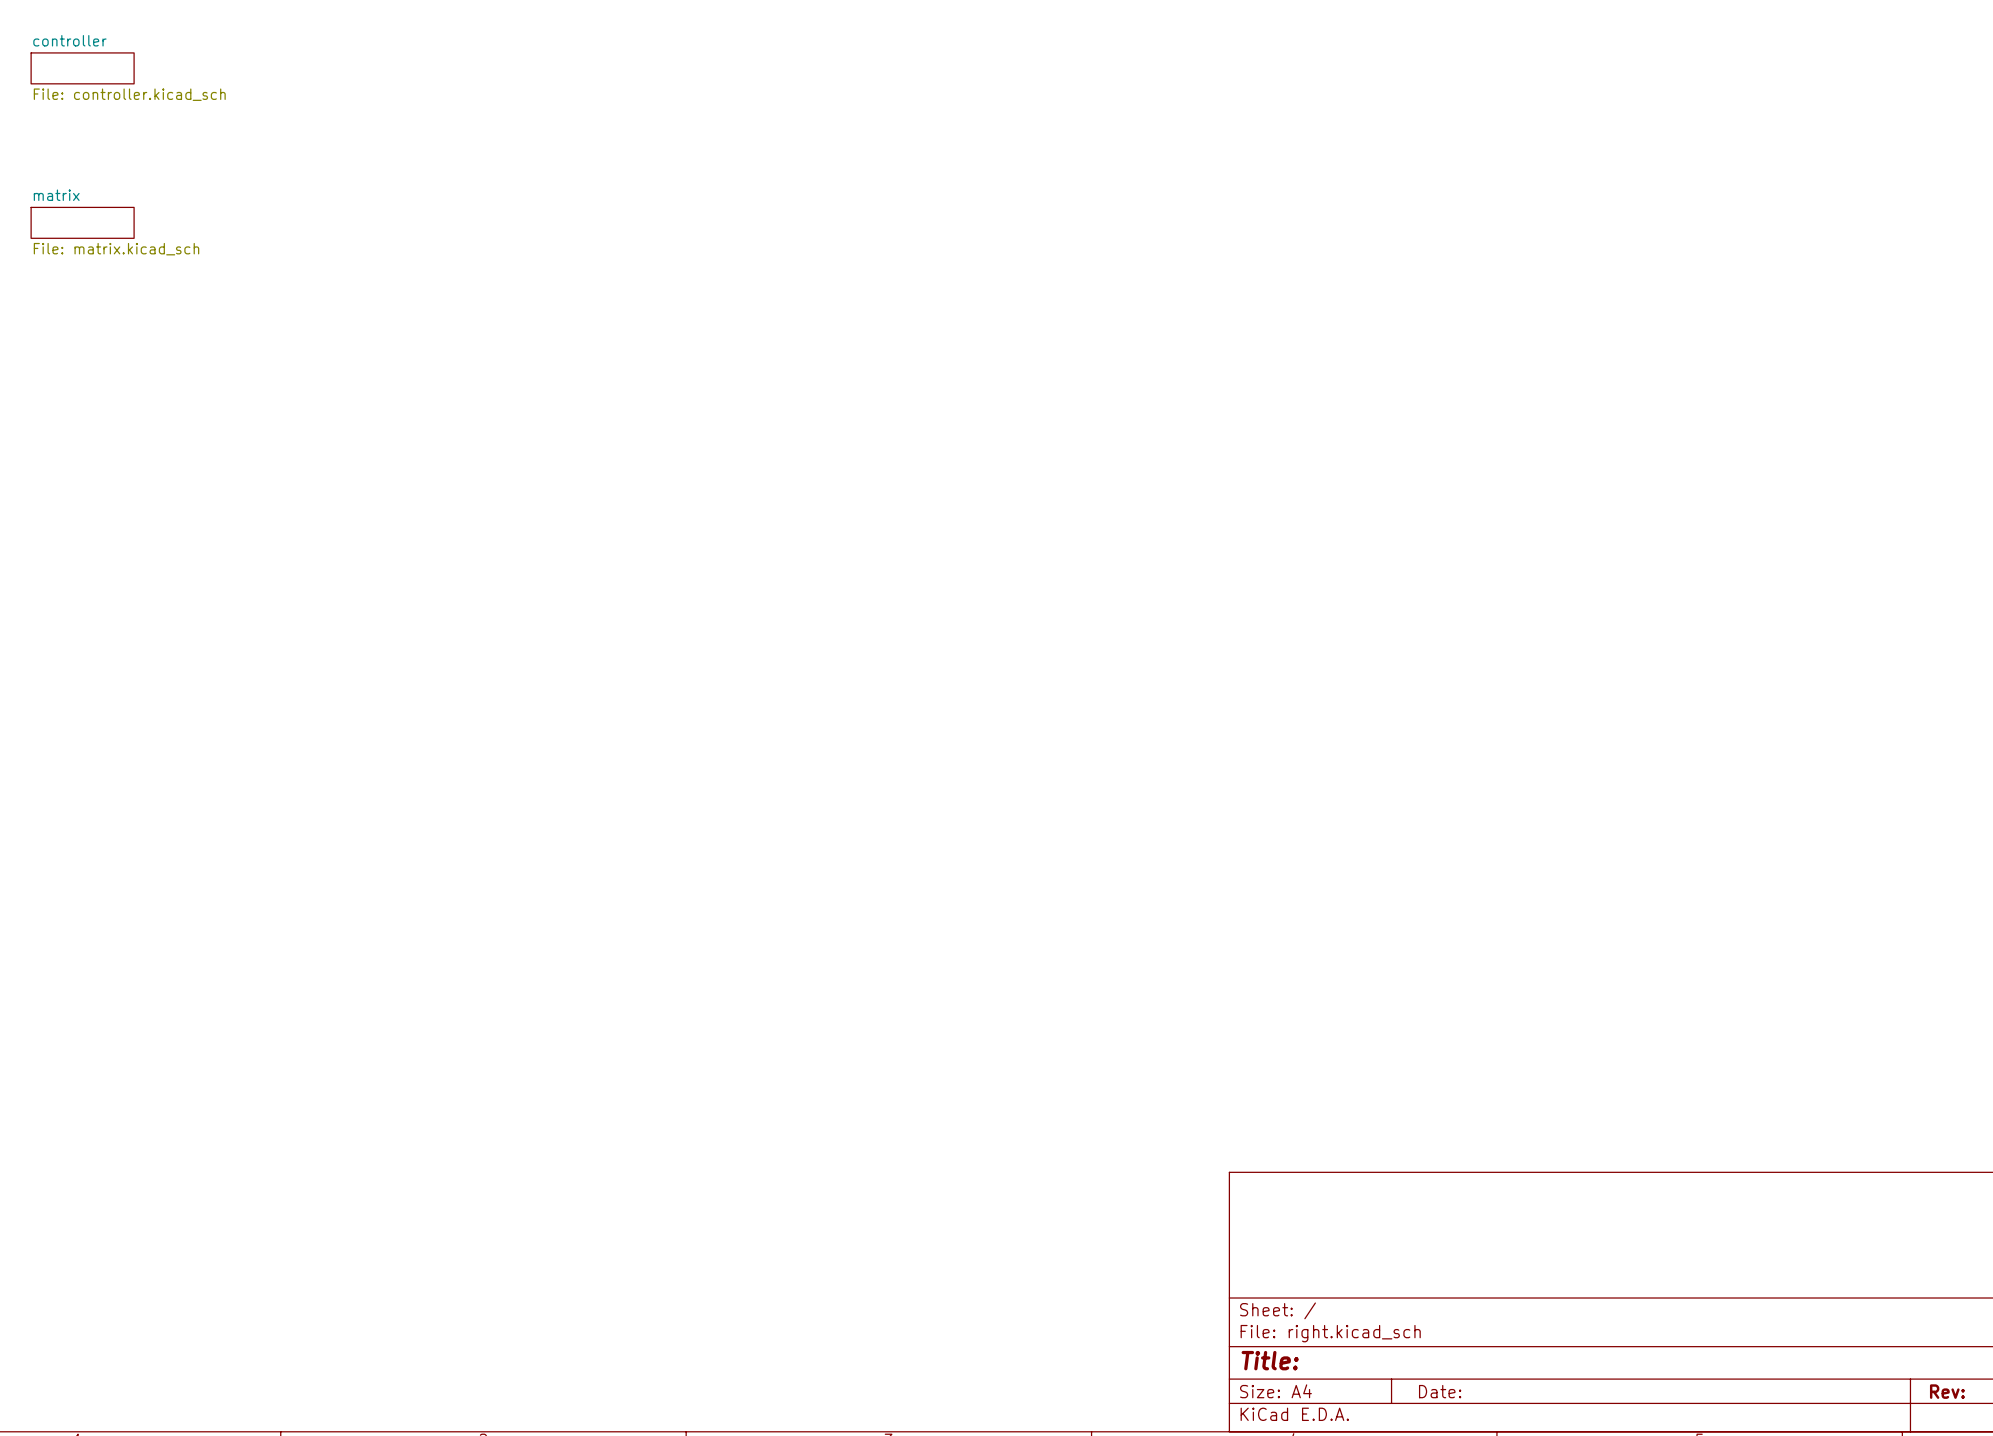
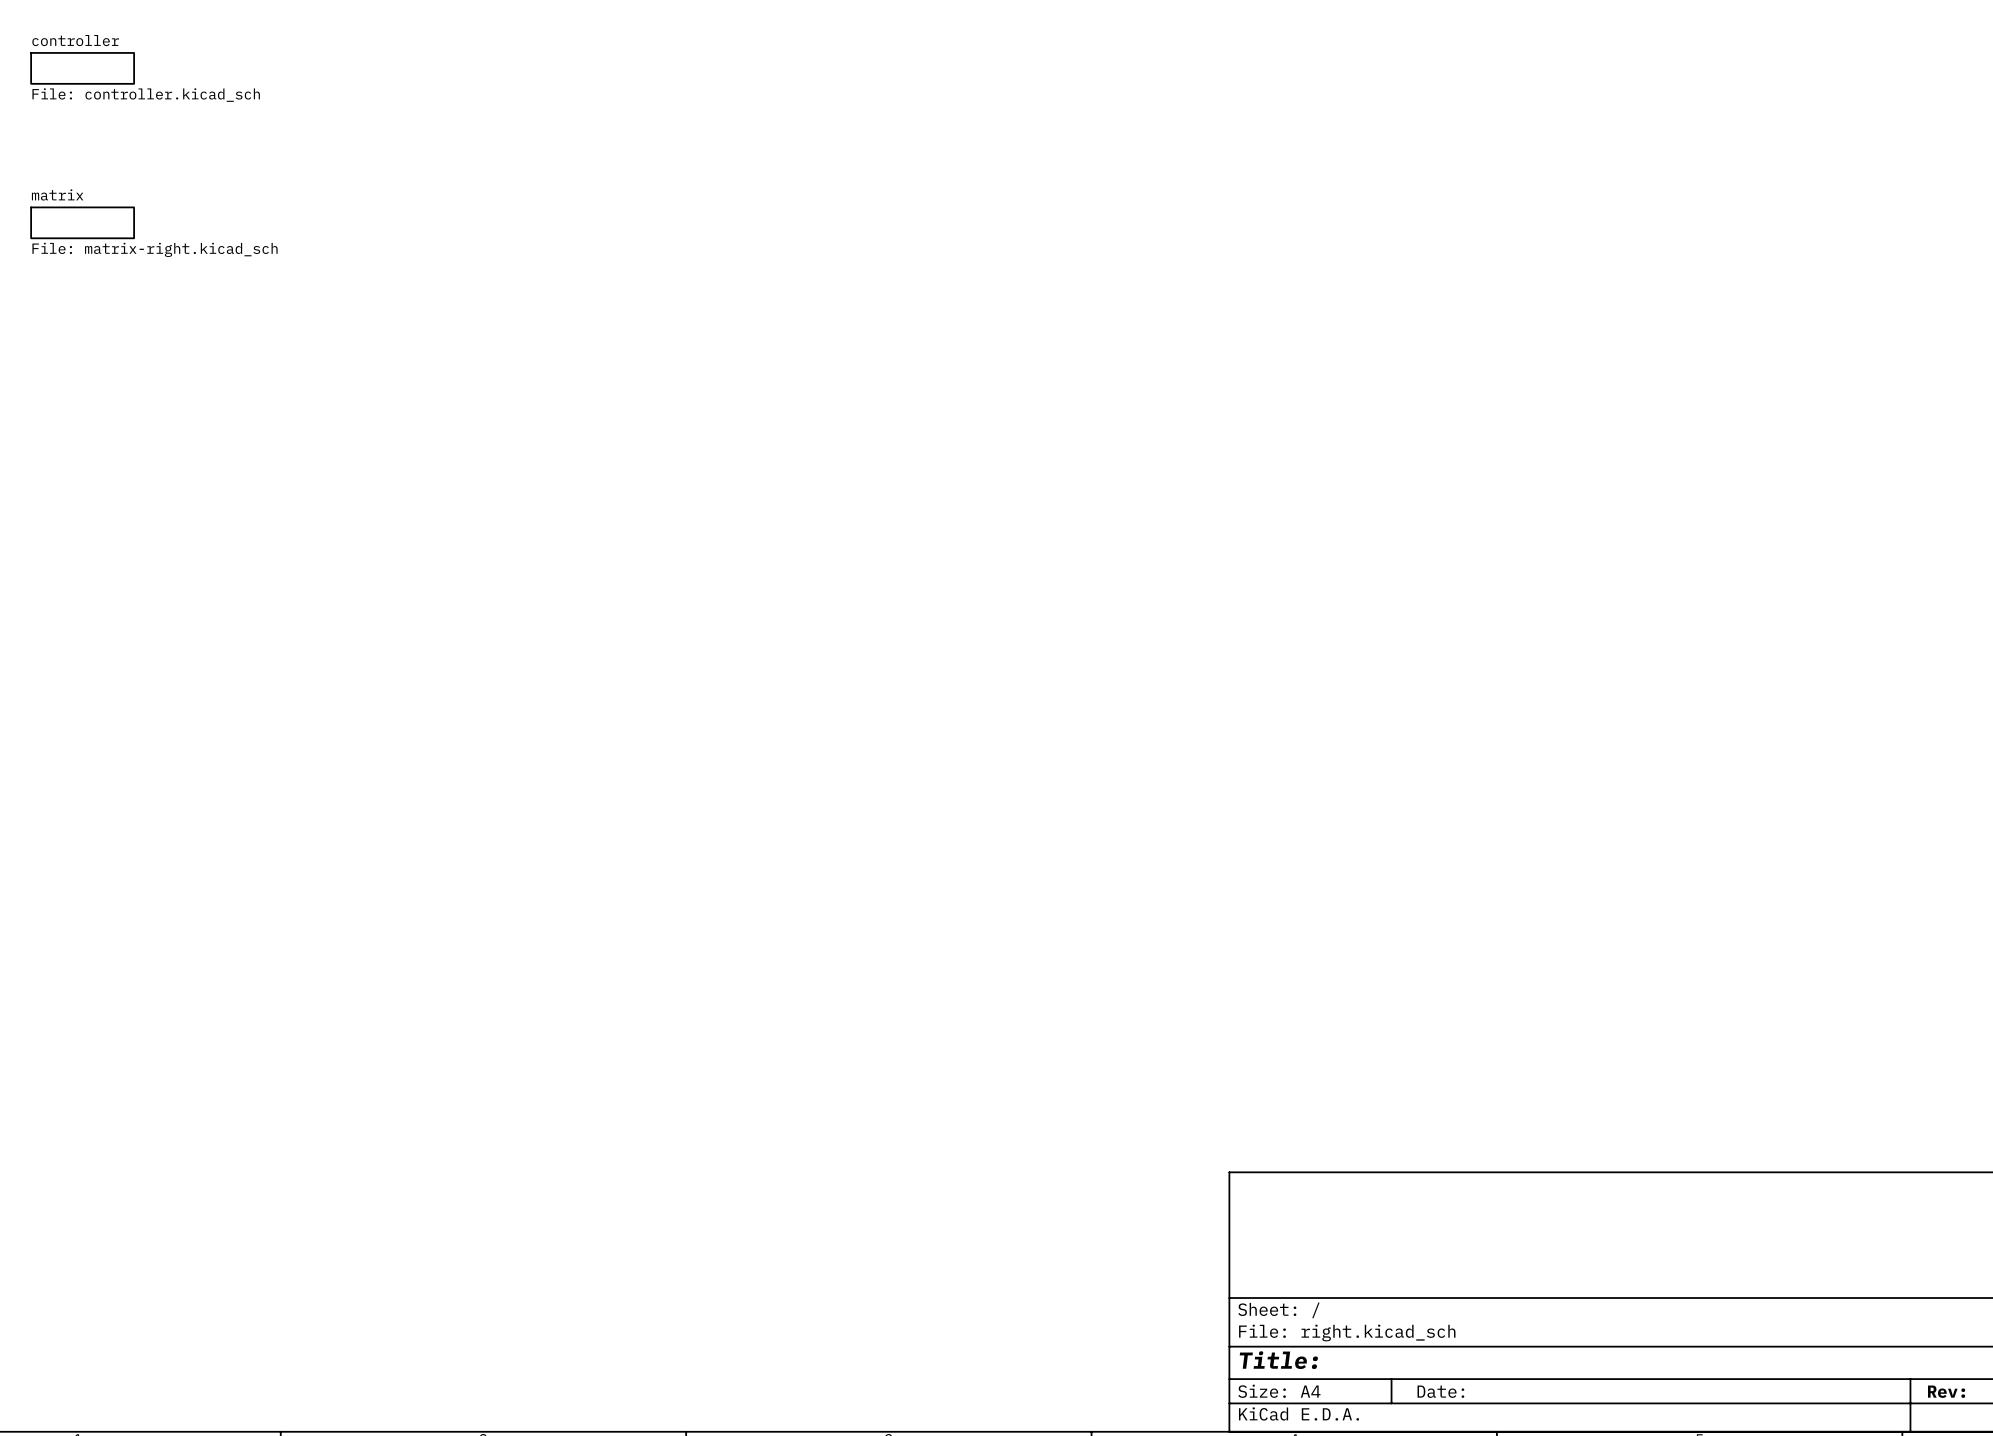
sheet matrix value: File: matrix.kicad_sch (116, 249) -> File: matrix-right.kicad_sch (155, 249)

